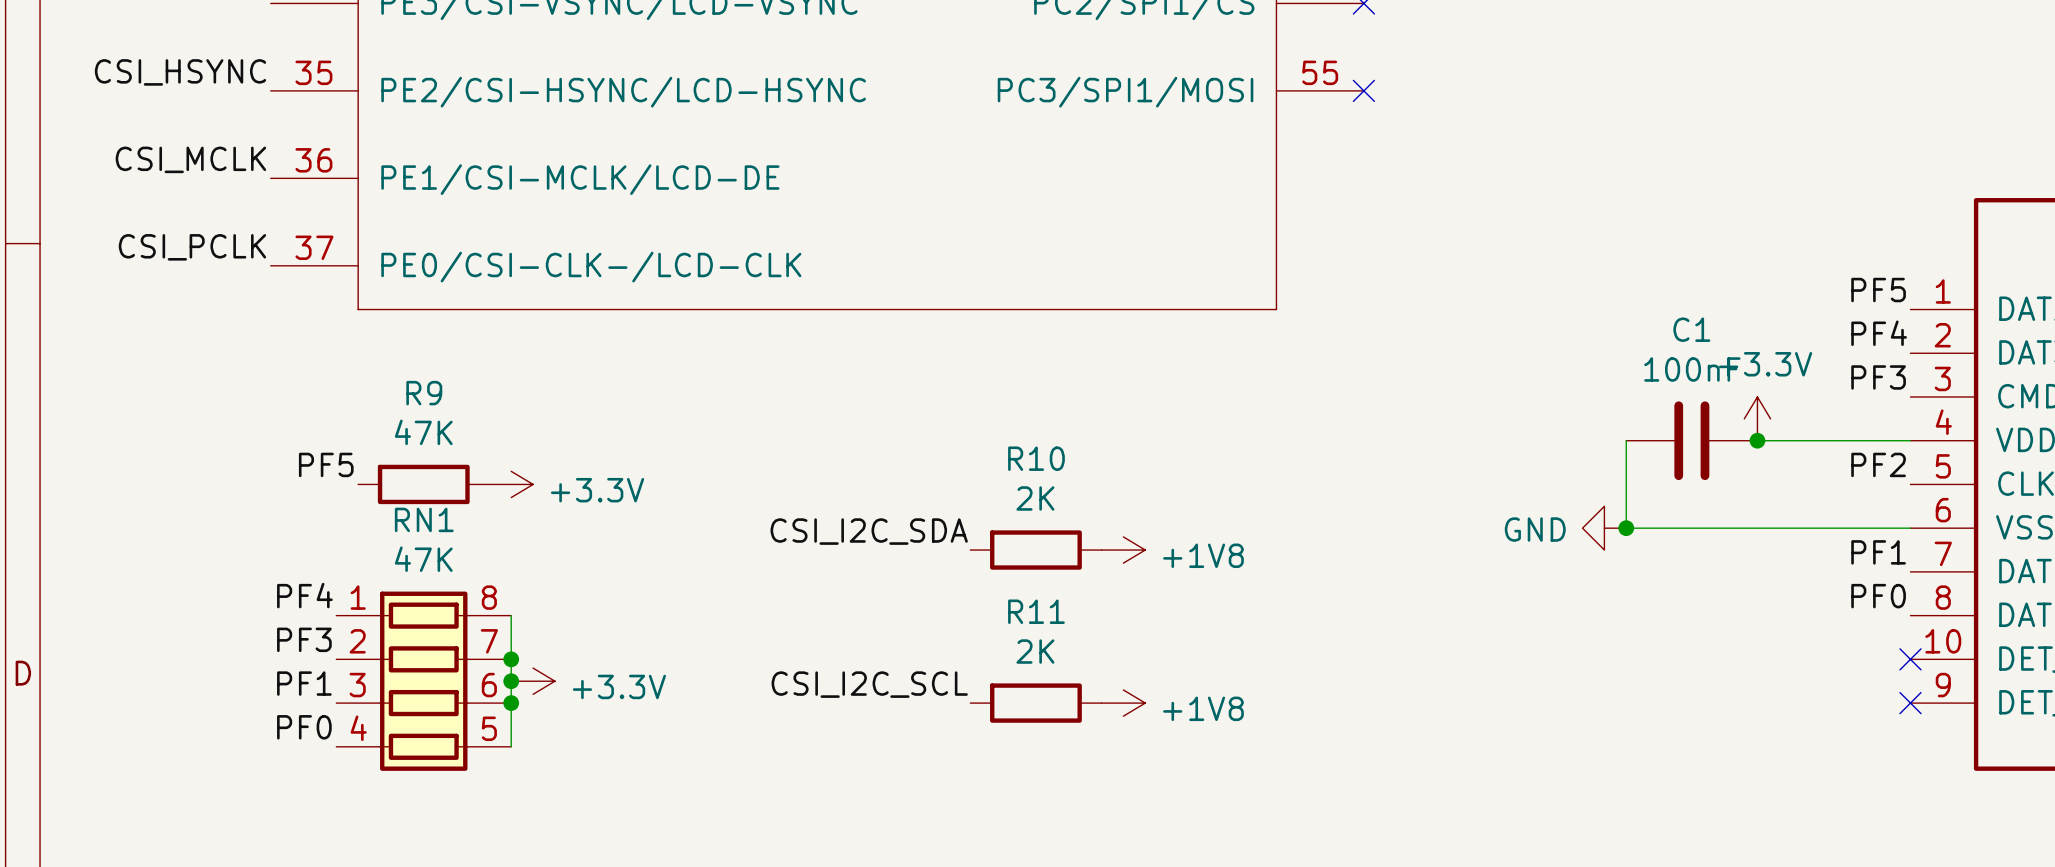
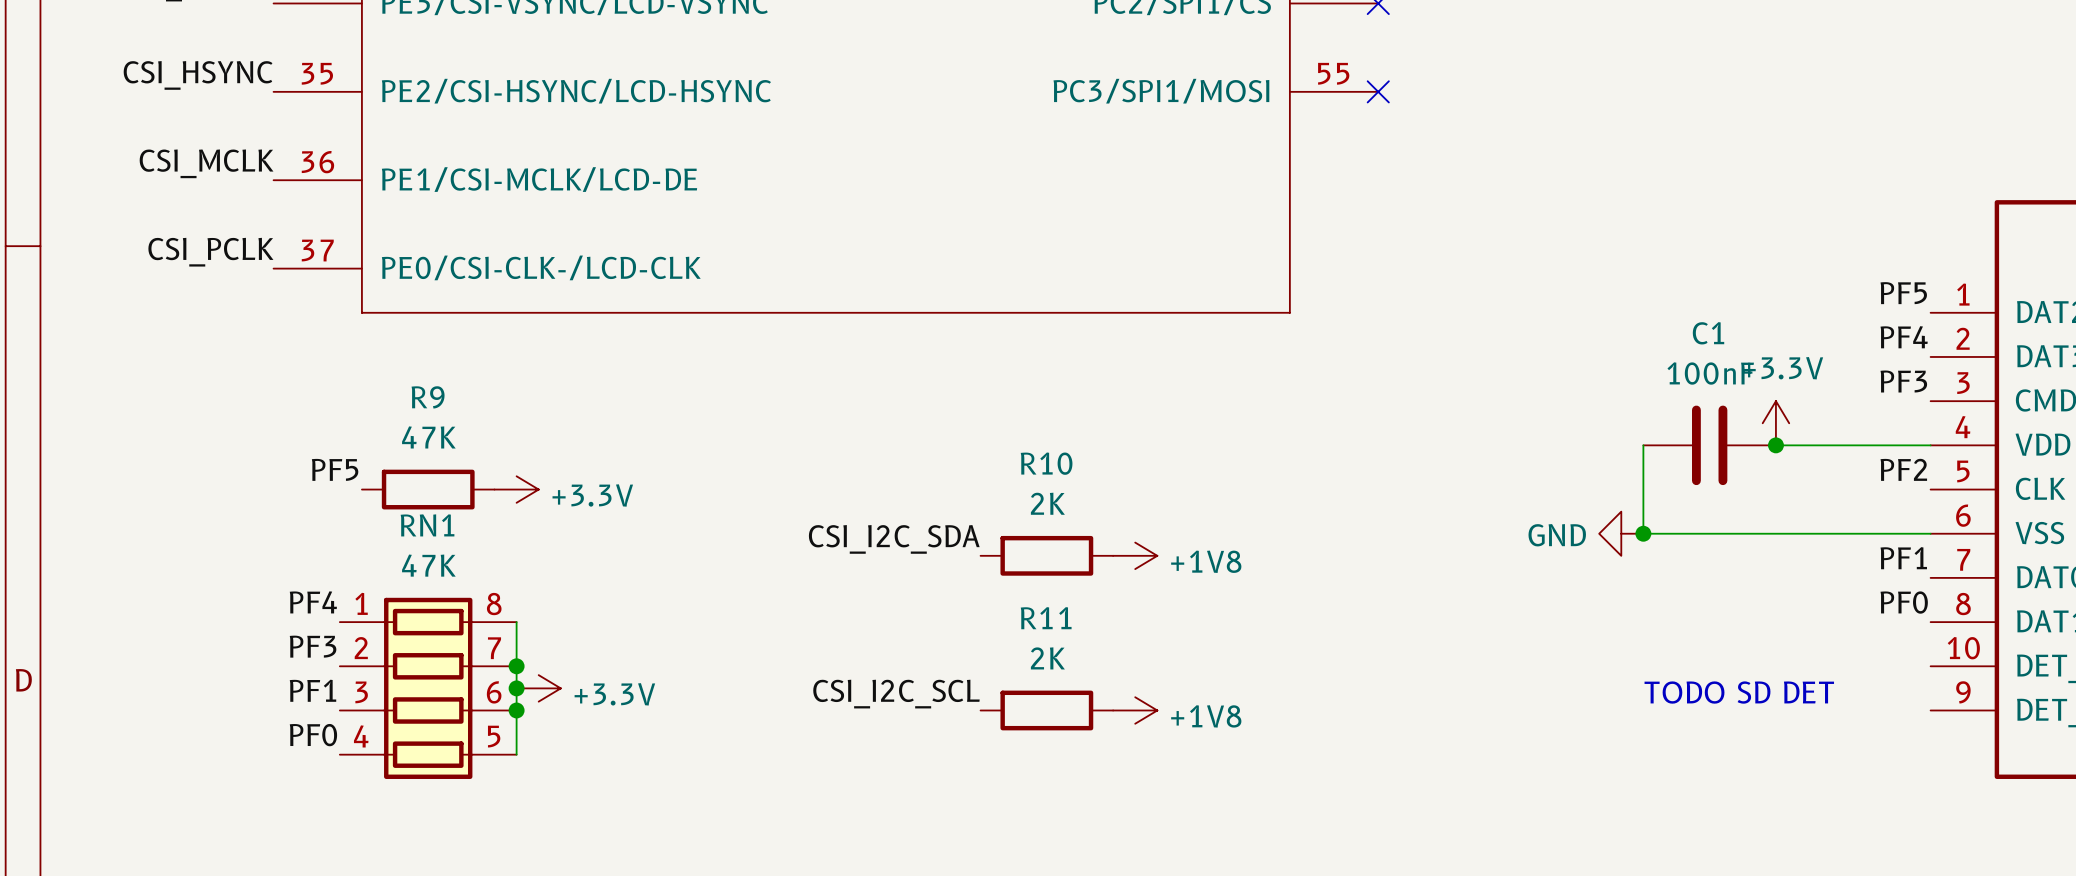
no-connect mark: (1910, 659) -> none
text: none -> TODO SD DET (1739, 692)
no-connect mark: (1910, 703) -> none

